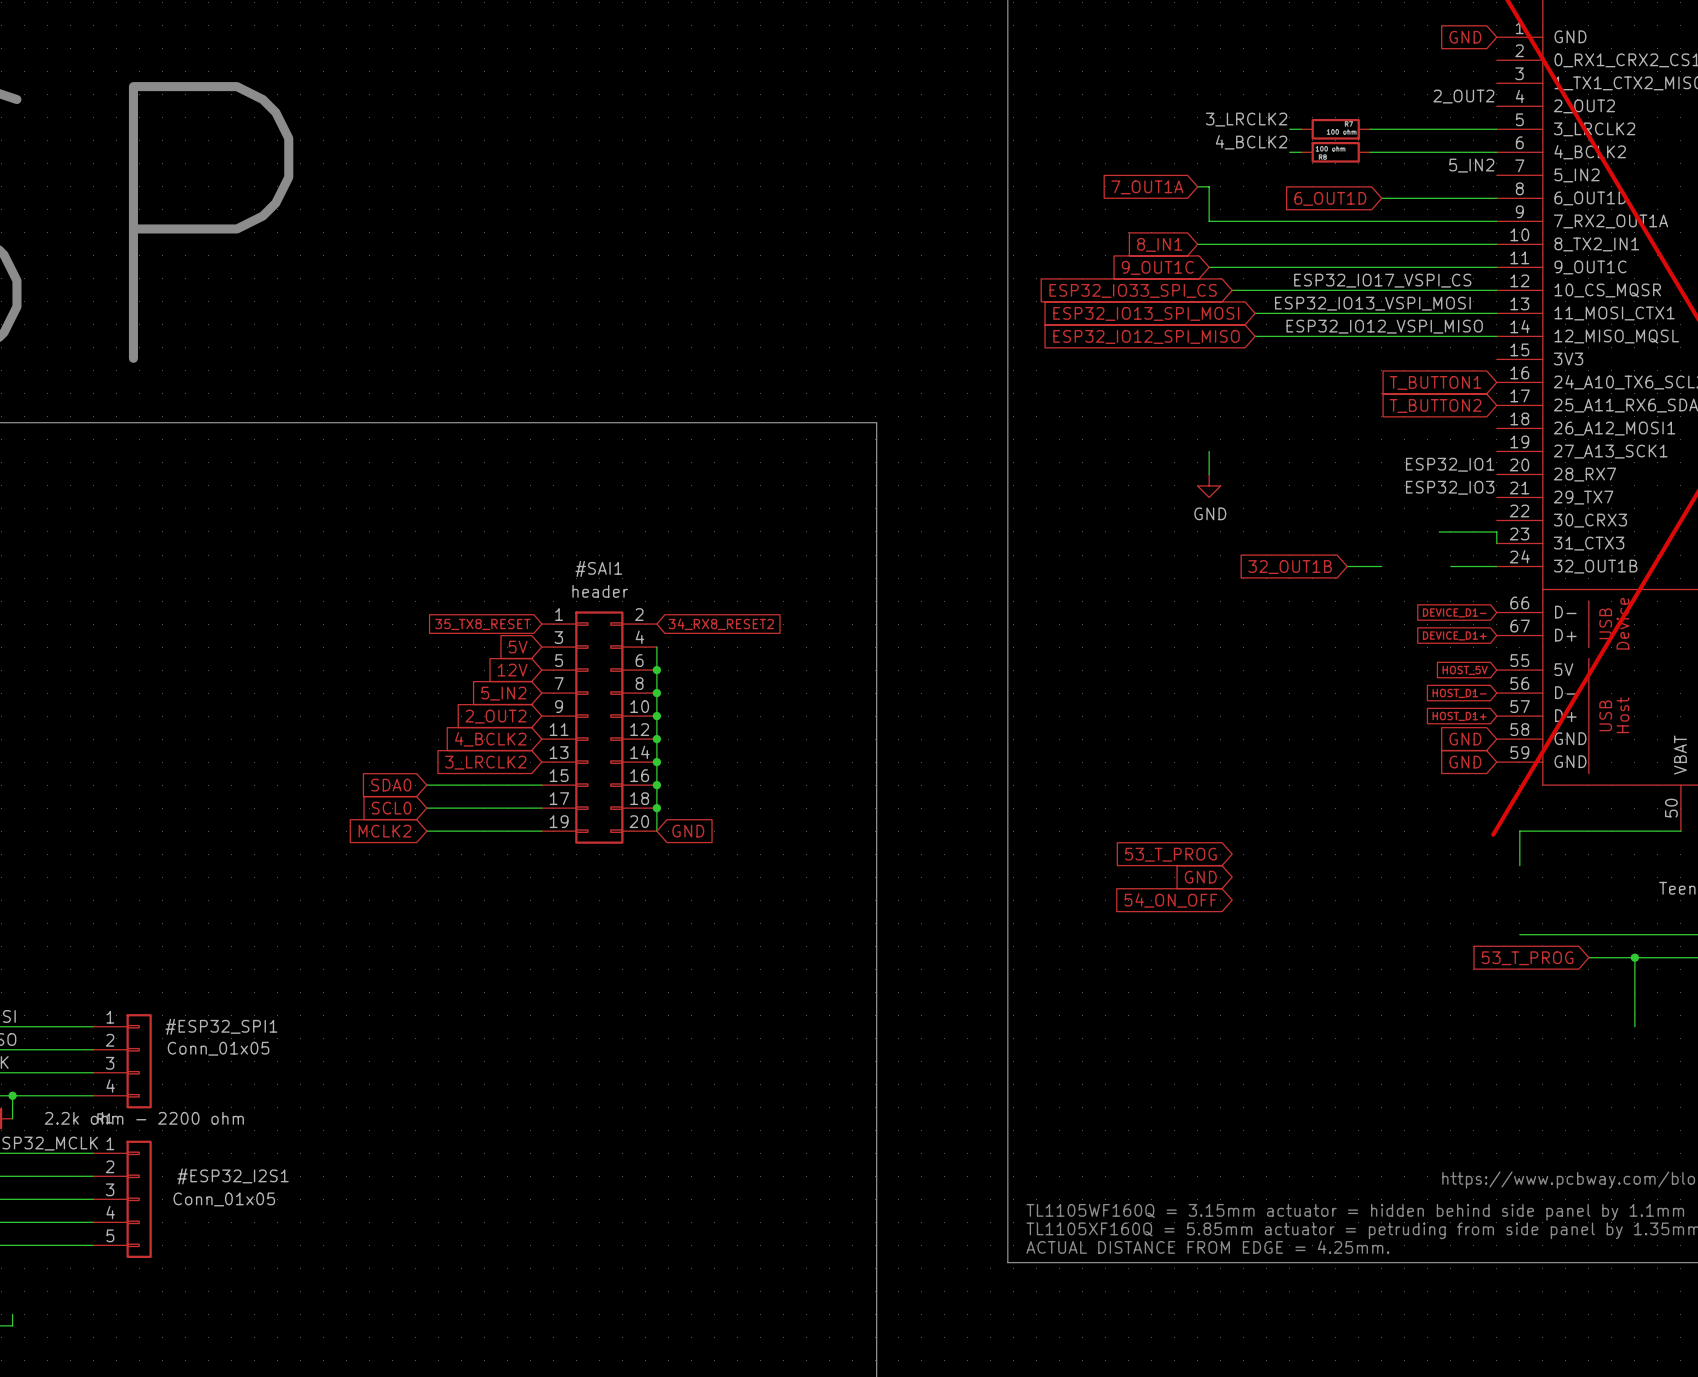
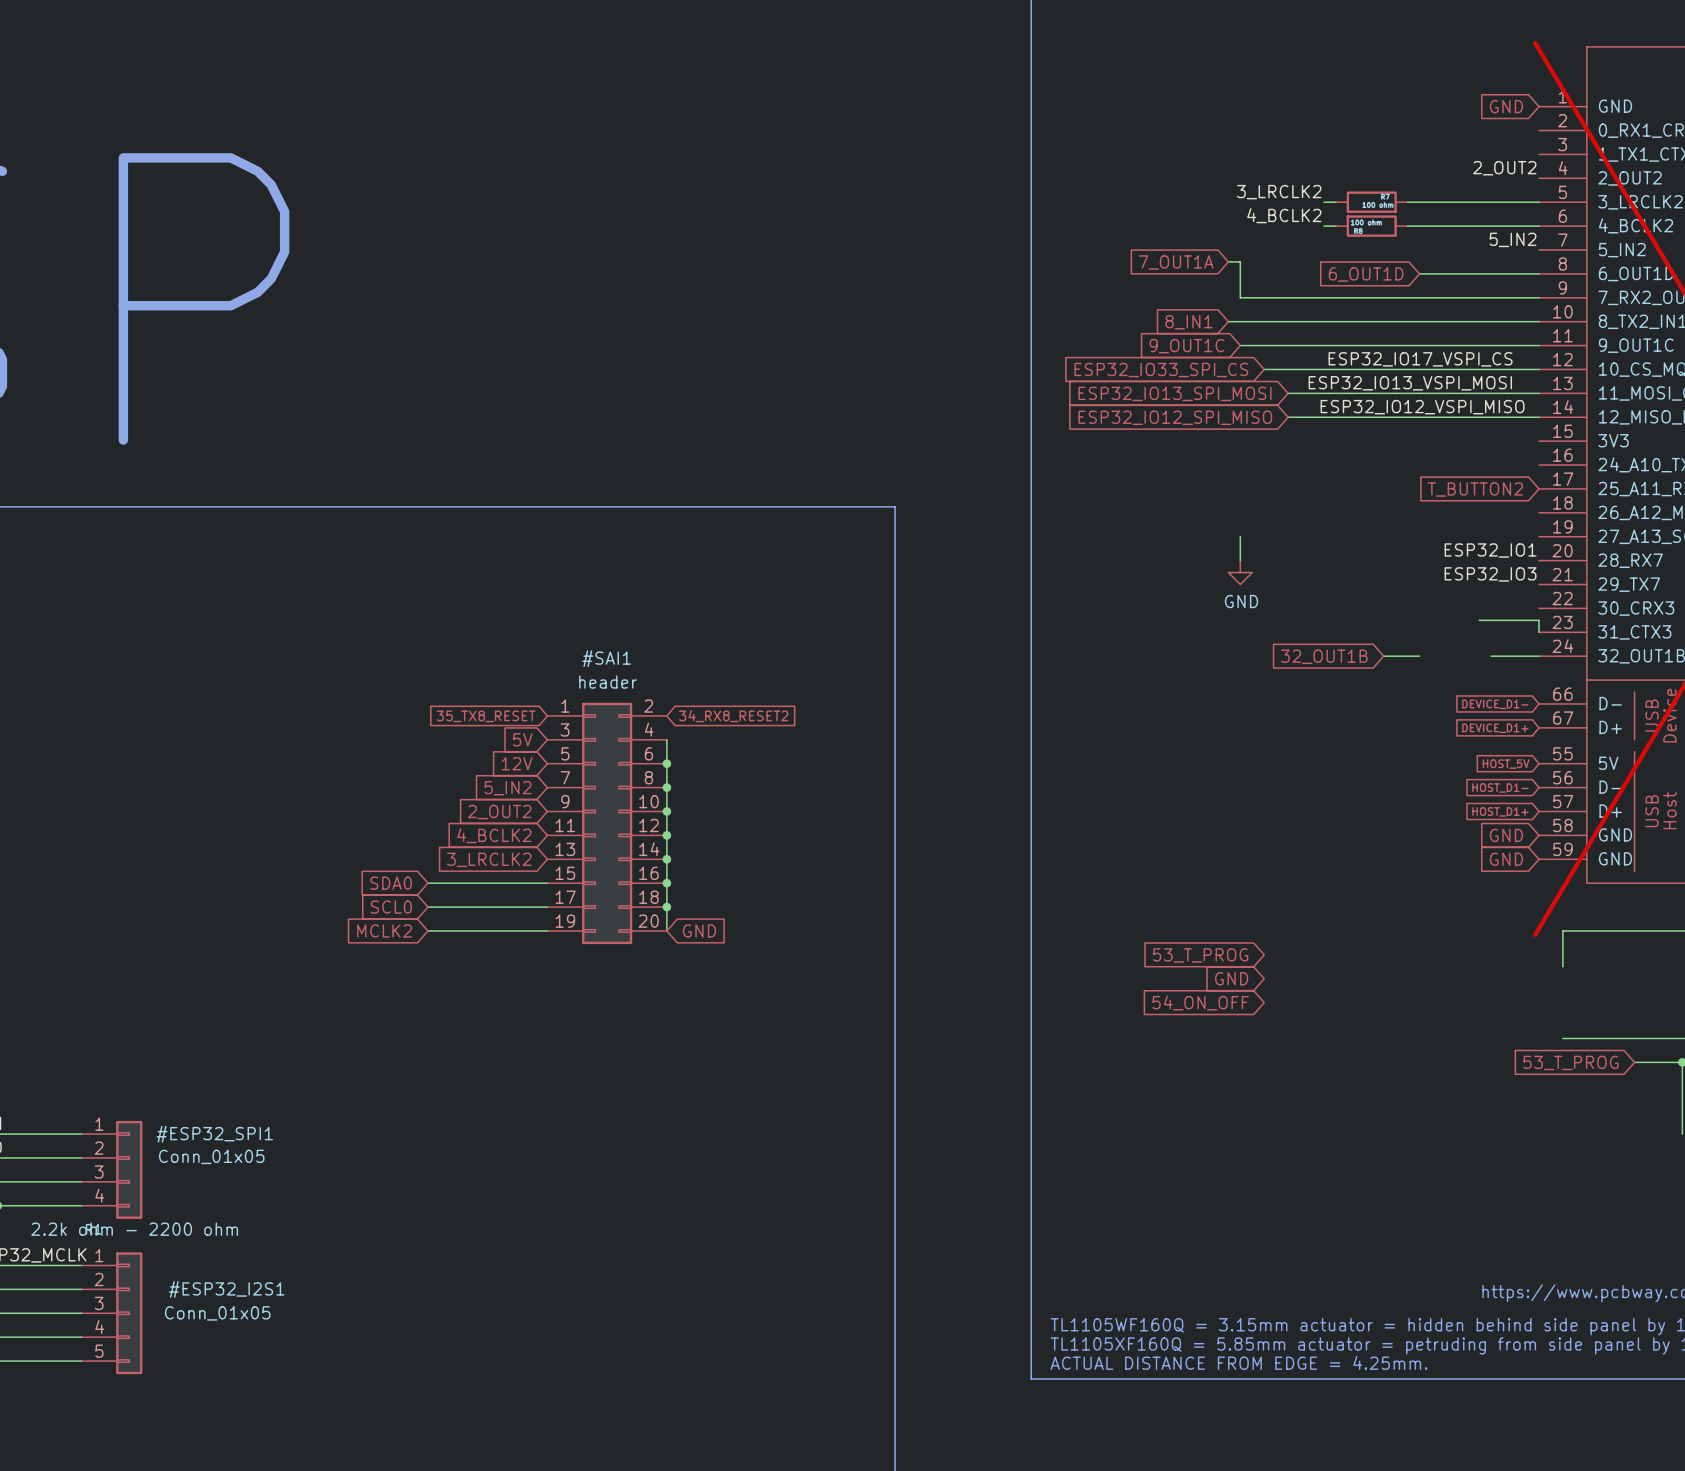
global label: T_BUTTON1 (1435, 382) -> none

